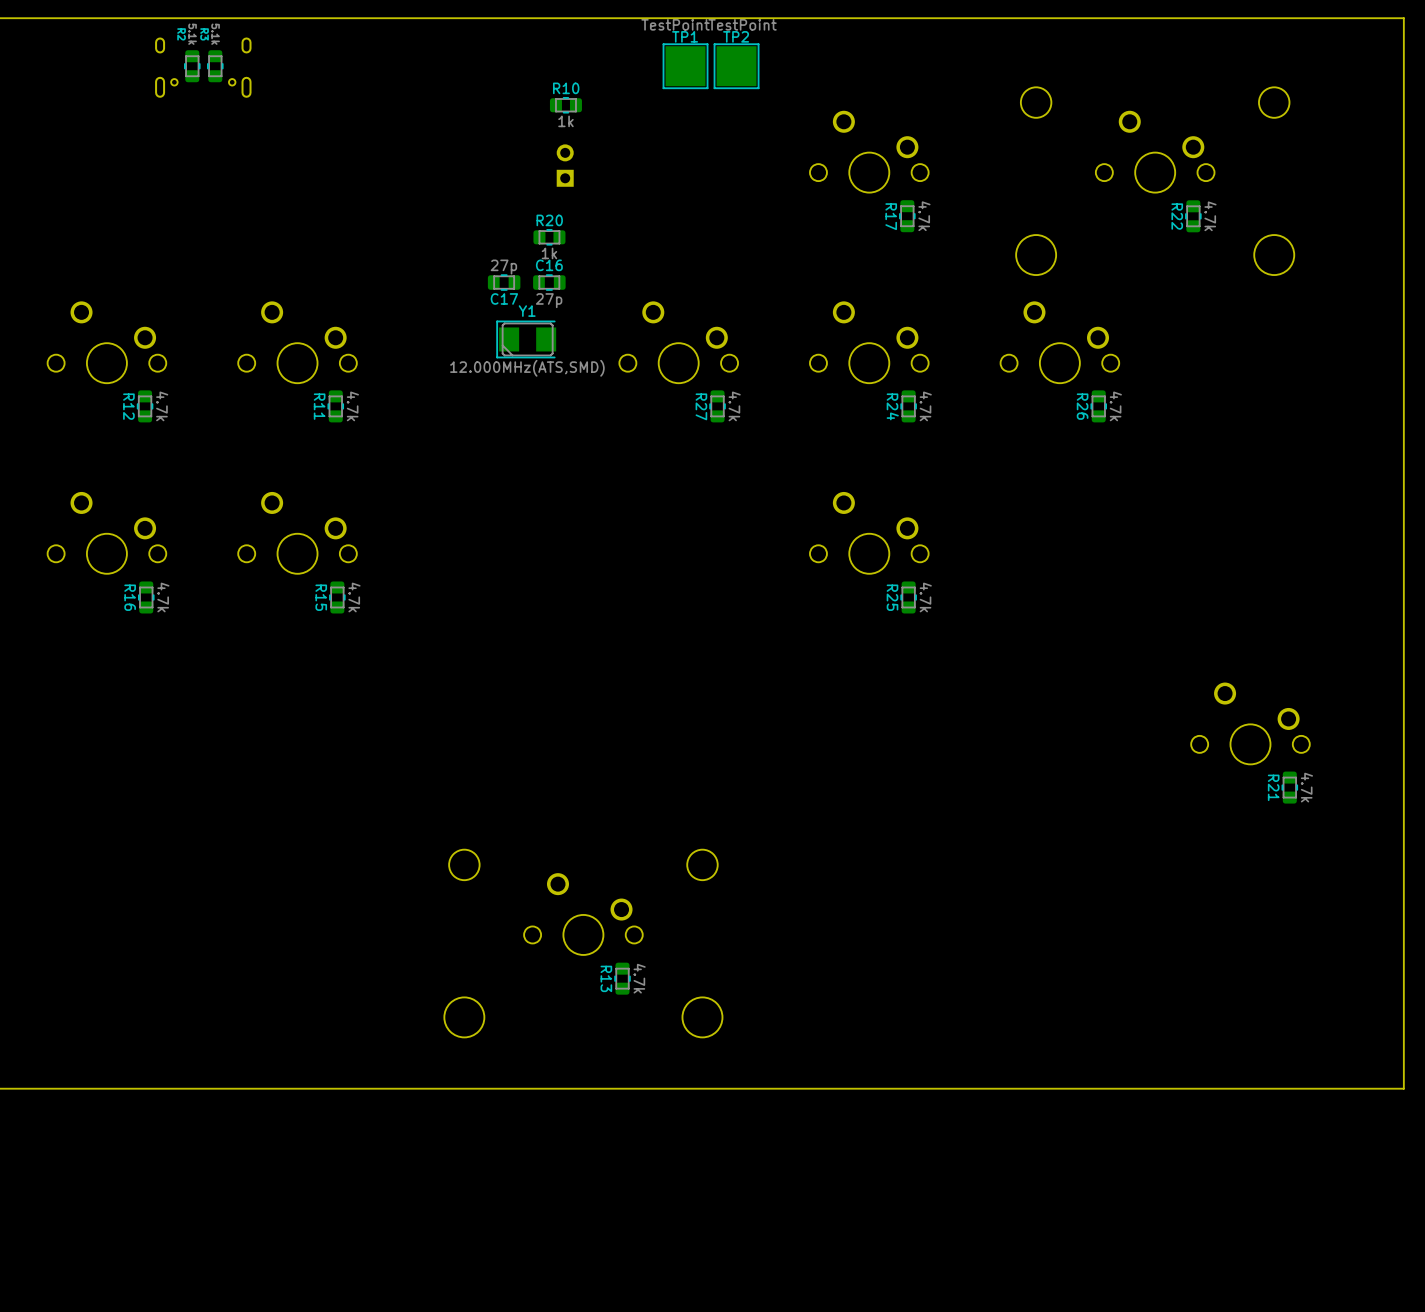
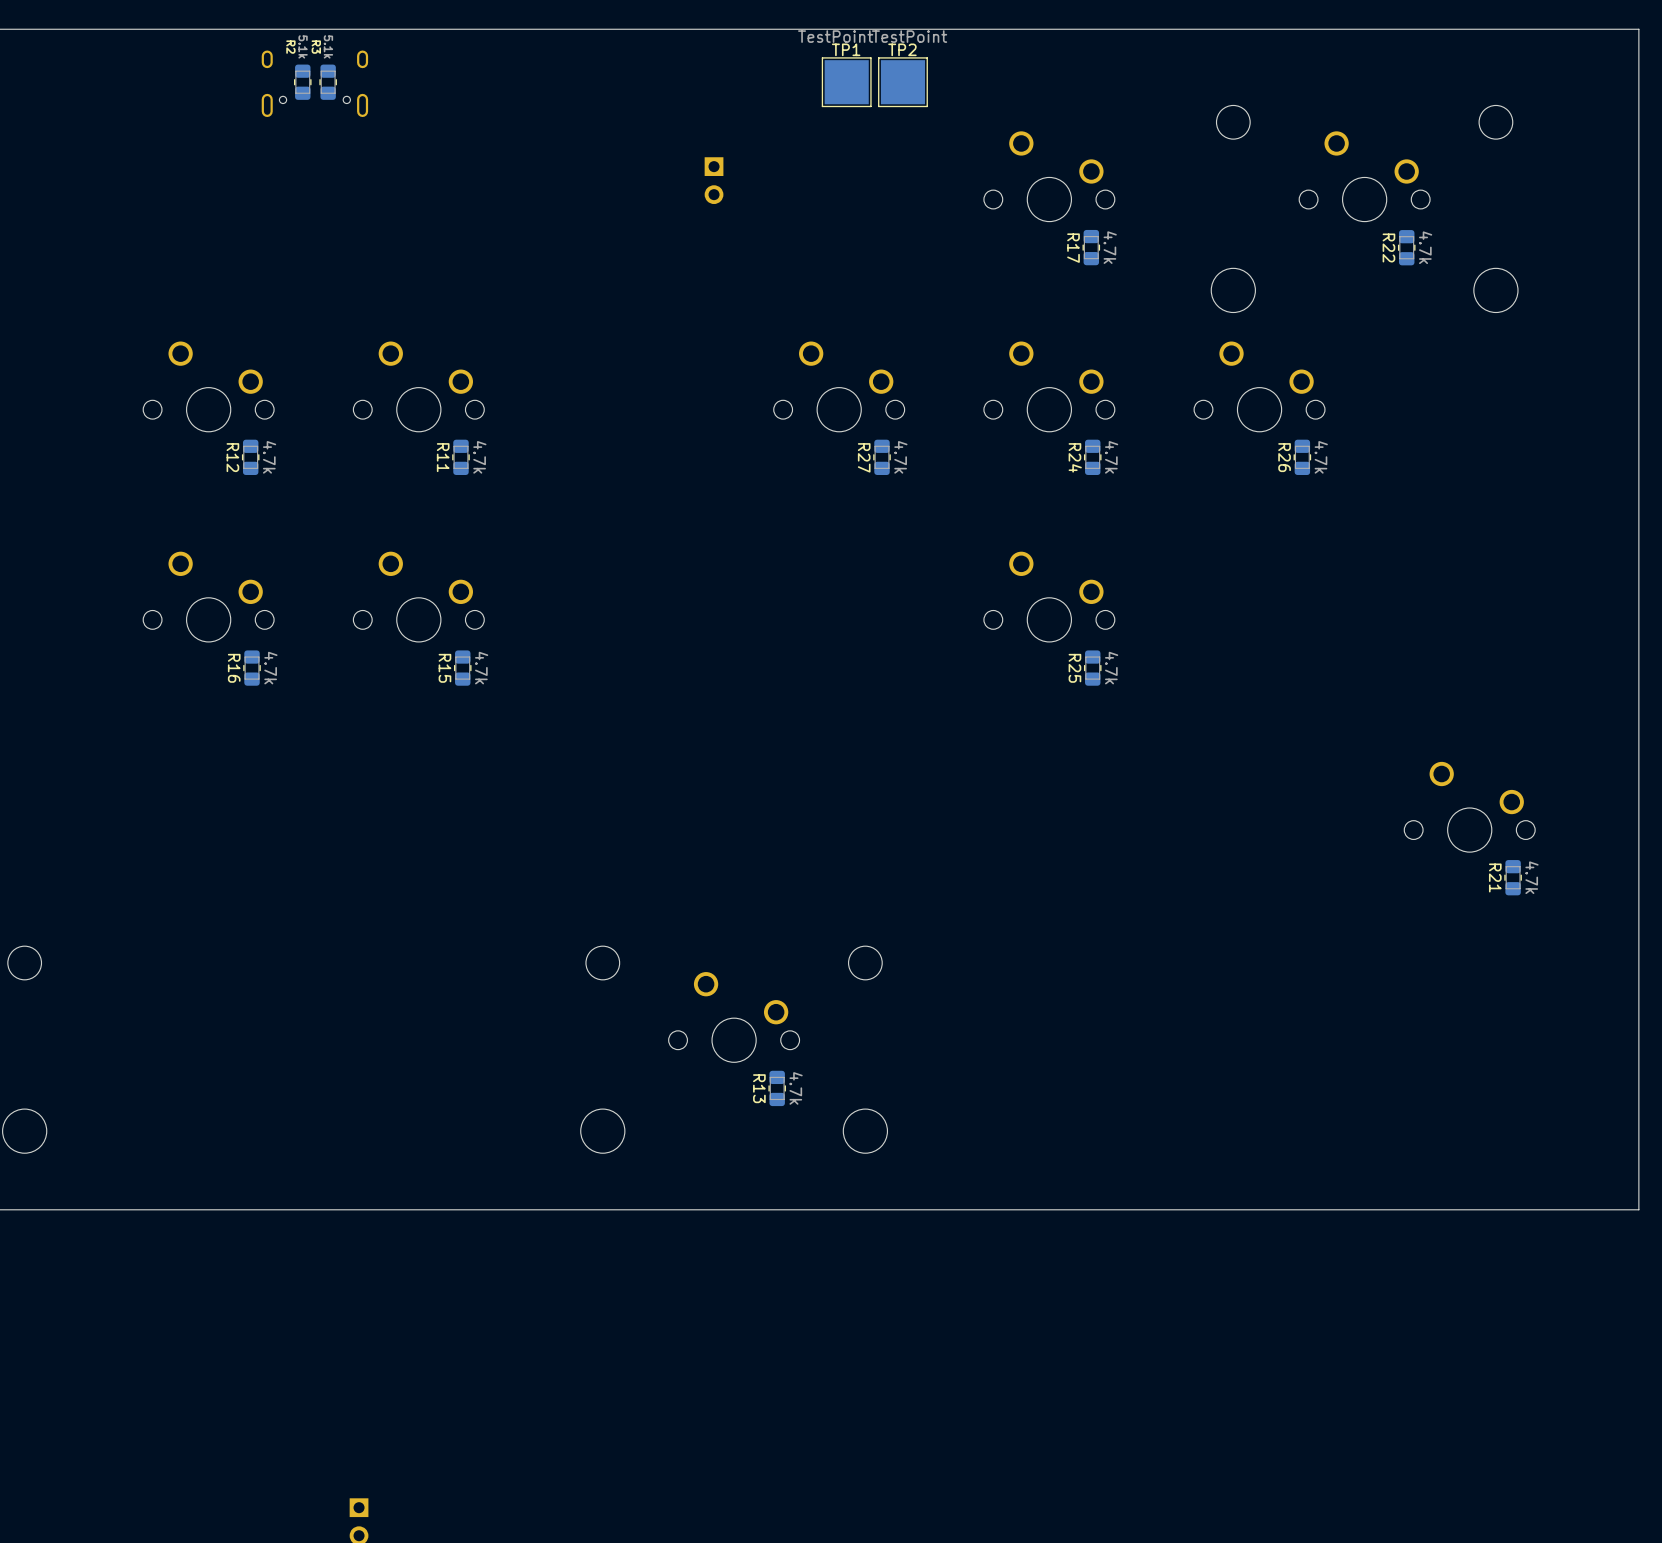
R10: 1k (565, 105) -> none
part rotation: 0° (565, 165) -> 180° (714, 180)
R20: 1k (549, 237) -> none
C17: 27p (504, 282) -> none
C16: 27p (549, 282) -> none
Y1: 12.000MHz(ATS,SMD) (526, 339) -> none

